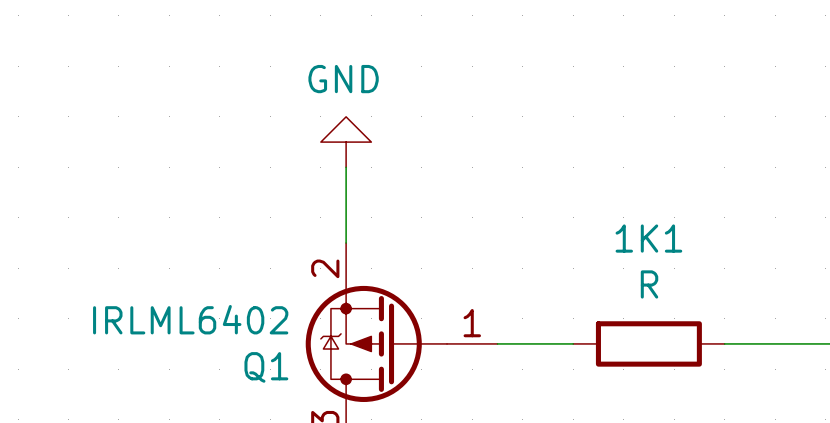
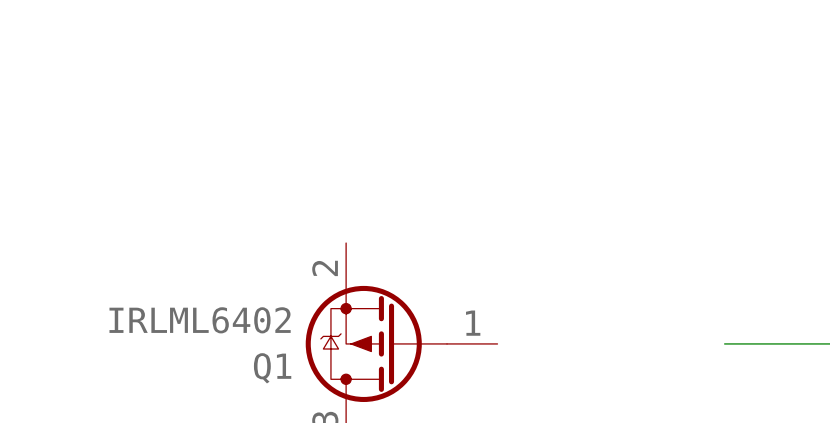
power symbol: GND (346, 142) -> none
wire: (346, 167) (346, 243) -> none
wire: (497, 343) (573, 343) -> none
1K1: R (648, 343) -> none

